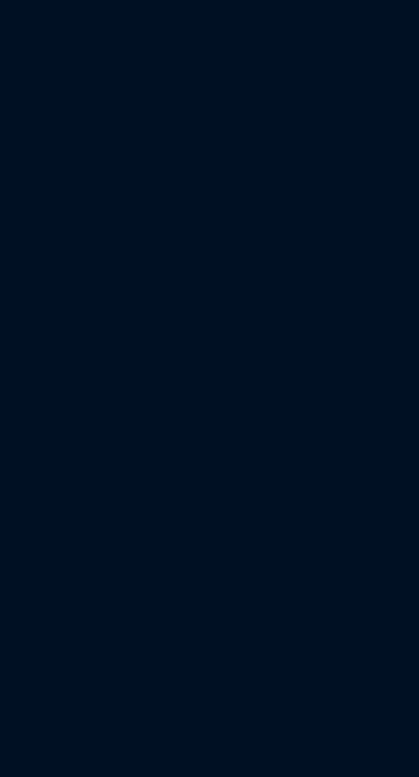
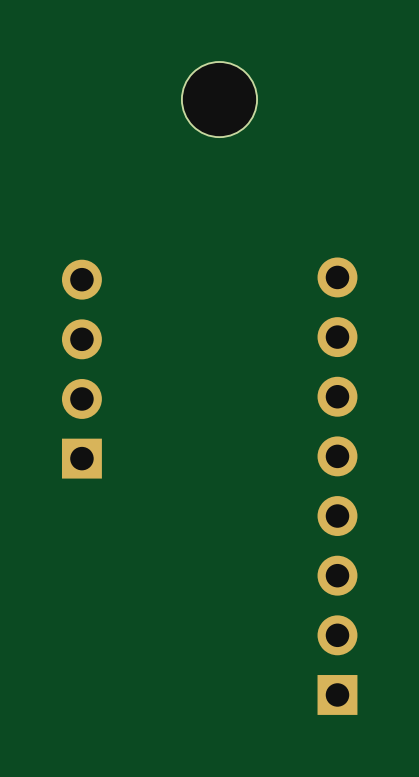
part: none -> (219, 99)
part: none -> (81, 369)
part: none -> (337, 486)

